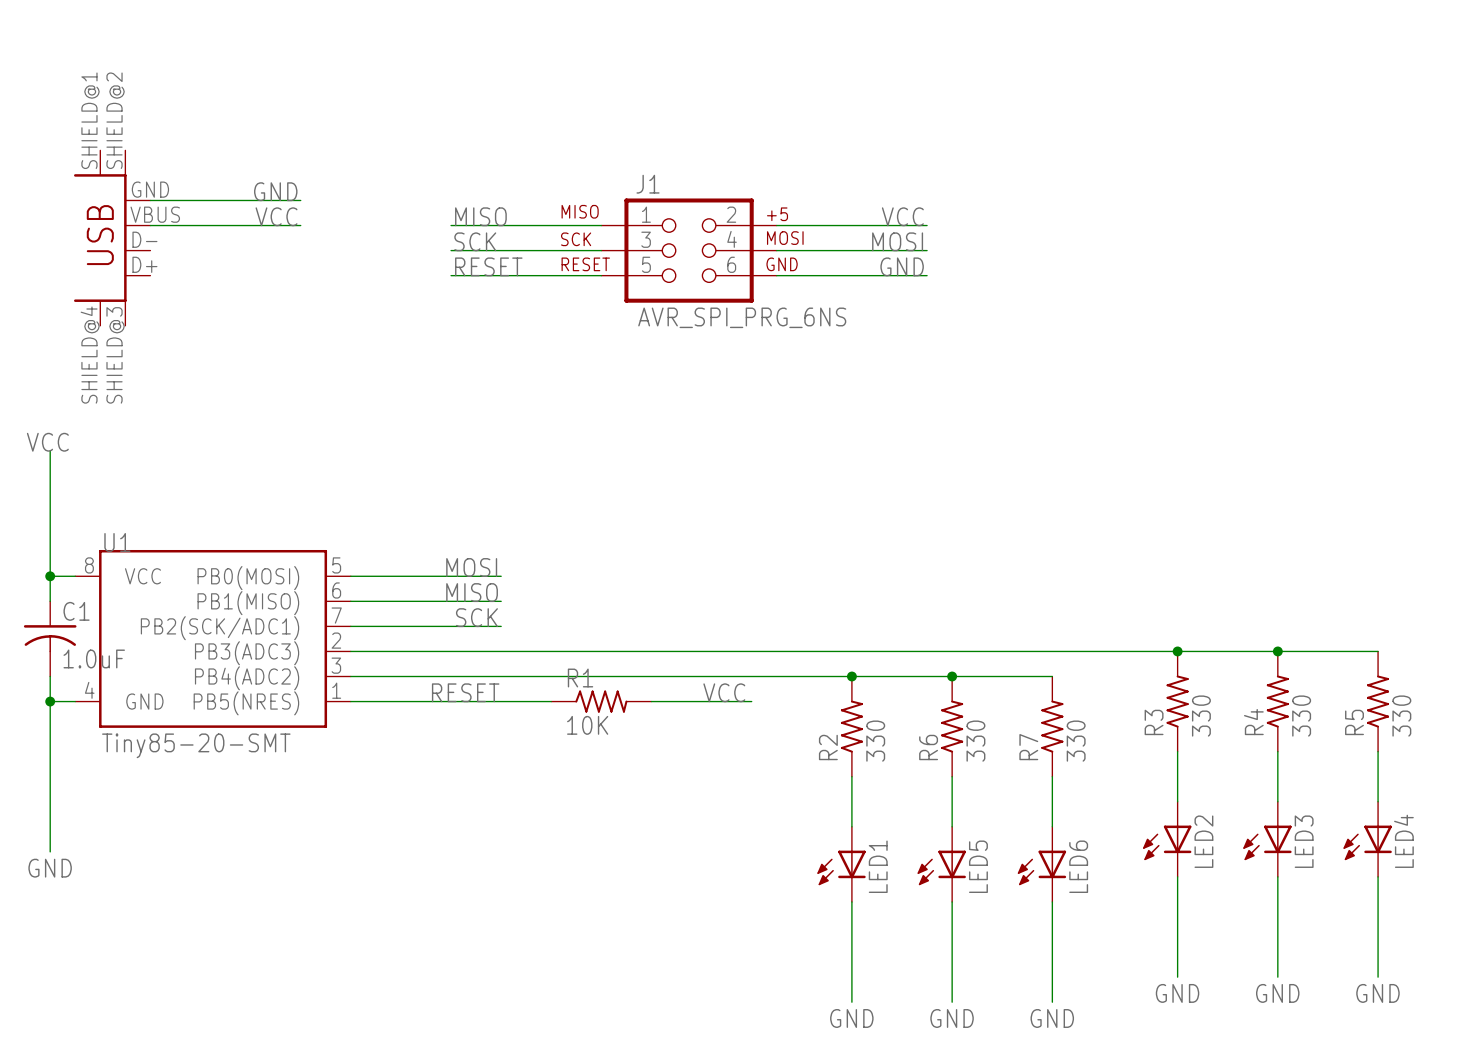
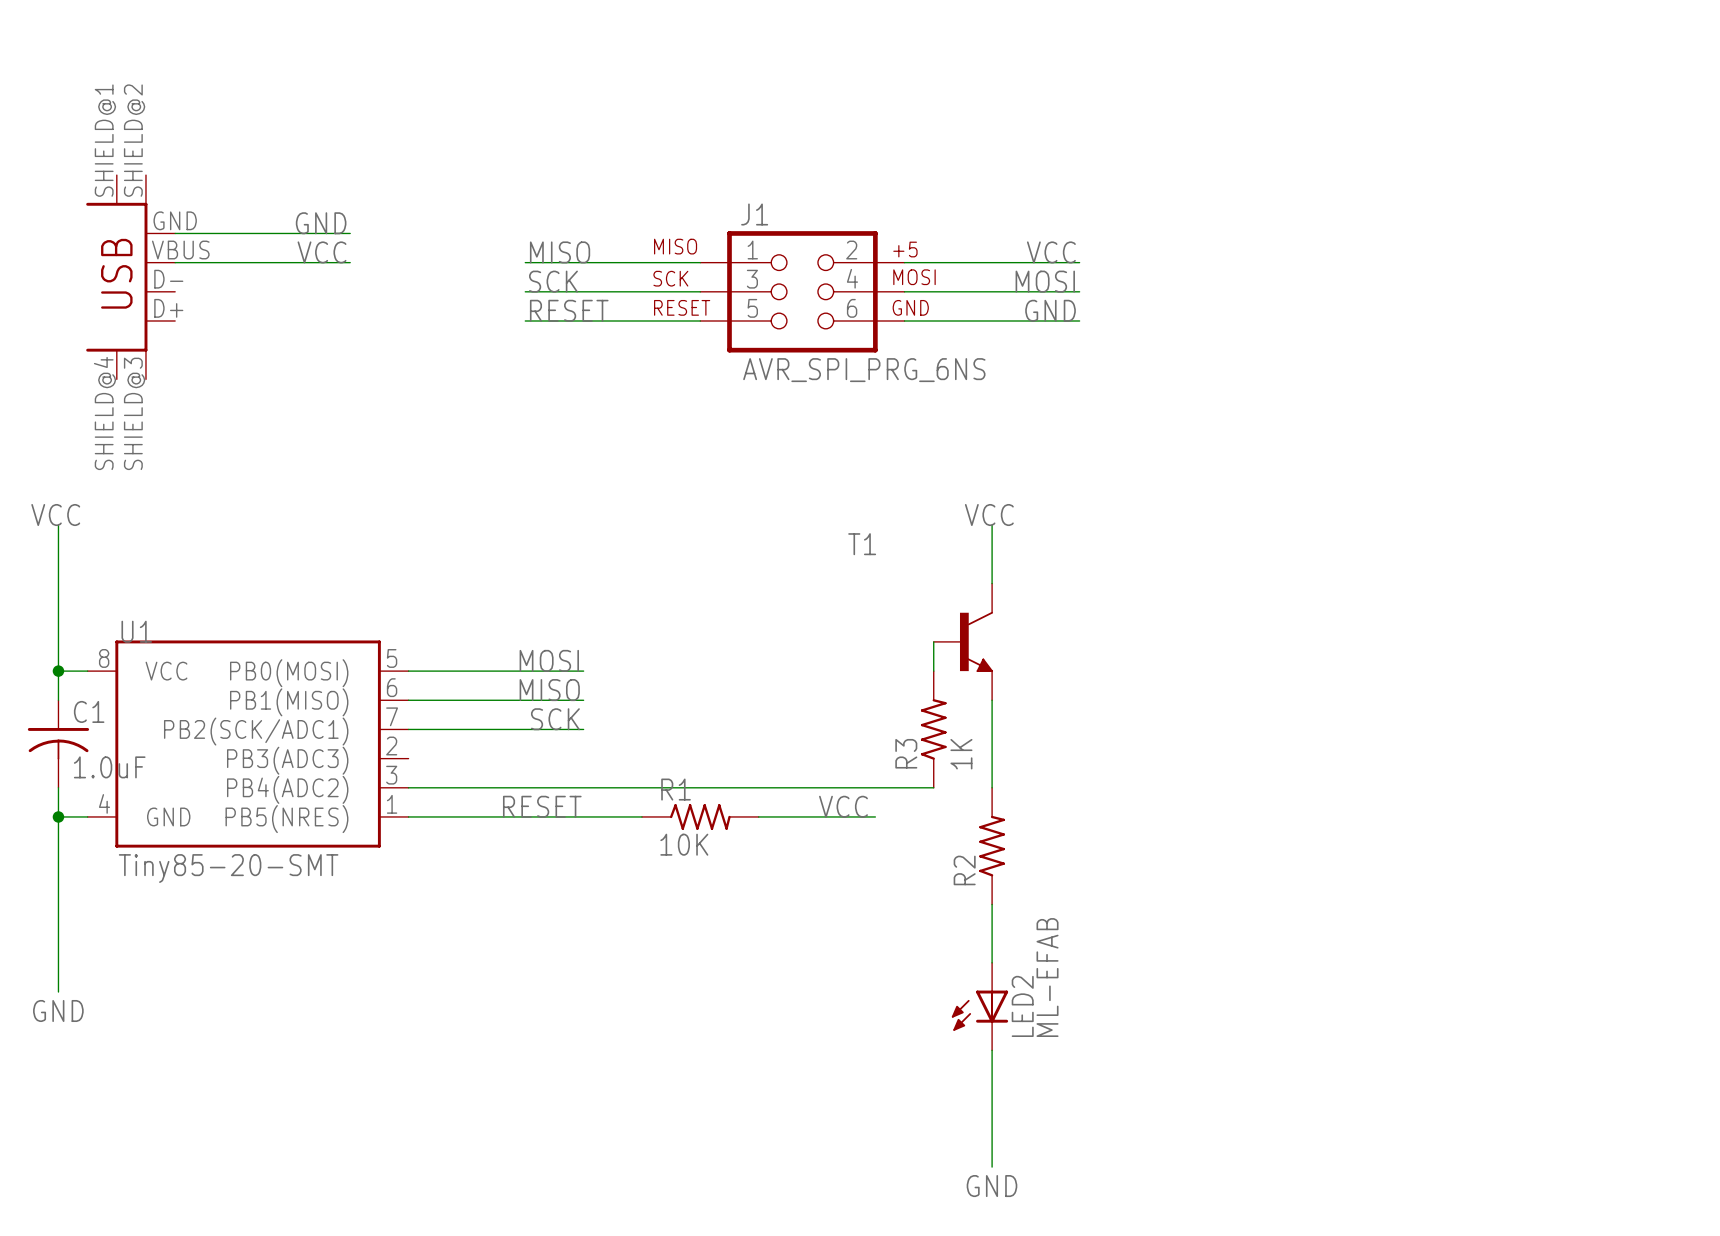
label: none -> VCC (989, 515)
wire: none -> (992, 525) (992, 583)
wire: none -> (933, 641) (933, 671)
T1: none -> (963, 641)
wire: none -> (992, 700) (992, 787)
wire: (350, 651) (1378, 651) -> none
junction: (1177, 651) -> none
junction: (1277, 651) -> none
wire: (801, 676) (1052, 676) -> none
junction: (851, 676) -> none
junction: (952, 676) -> none
R3 position: (1177, 701) -> (933, 729)
R4: 330 (1277, 701) -> none
R5: 330 (1378, 701) -> none
R3 value: 330 (1201, 716) -> 1K (961, 754)
R6: 330 (952, 726) -> none
R7: 330 (1052, 726) -> none
R2 value: 330 (875, 741) -> none
wire: (1177, 751) (1177, 801) -> none
wire: (1277, 751) (1277, 801) -> none
wire: (1378, 751) (1378, 801) -> none
wire: (952, 776) (952, 826) -> none
wire: (1052, 776) (1052, 826) -> none
LED2 symbol: [1143, 801, 1192, 877] -> [951, 962, 1009, 1051]
LED2 value: none -> ML-EFAB (1047, 977)
LED3: (1267, 839) -> none
LED4: (1367, 839) -> none
LED1: (841, 864) -> none
LED5: (941, 864) -> none
LED6: (1041, 864) -> none
wire: (1177, 876) (1177, 977) -> none
wire: (1277, 876) (1277, 977) -> none
wire: (1378, 876) (1378, 977) -> none
wire: (952, 901) (952, 1002) -> none
wire: (1052, 901) (1052, 1002) -> none
label: GND (1177, 993) -> none
label: GND (1277, 993) -> none
label: GND (1377, 993) -> none
label: GND (952, 1018) -> none
label: GND (1052, 1018) -> none

